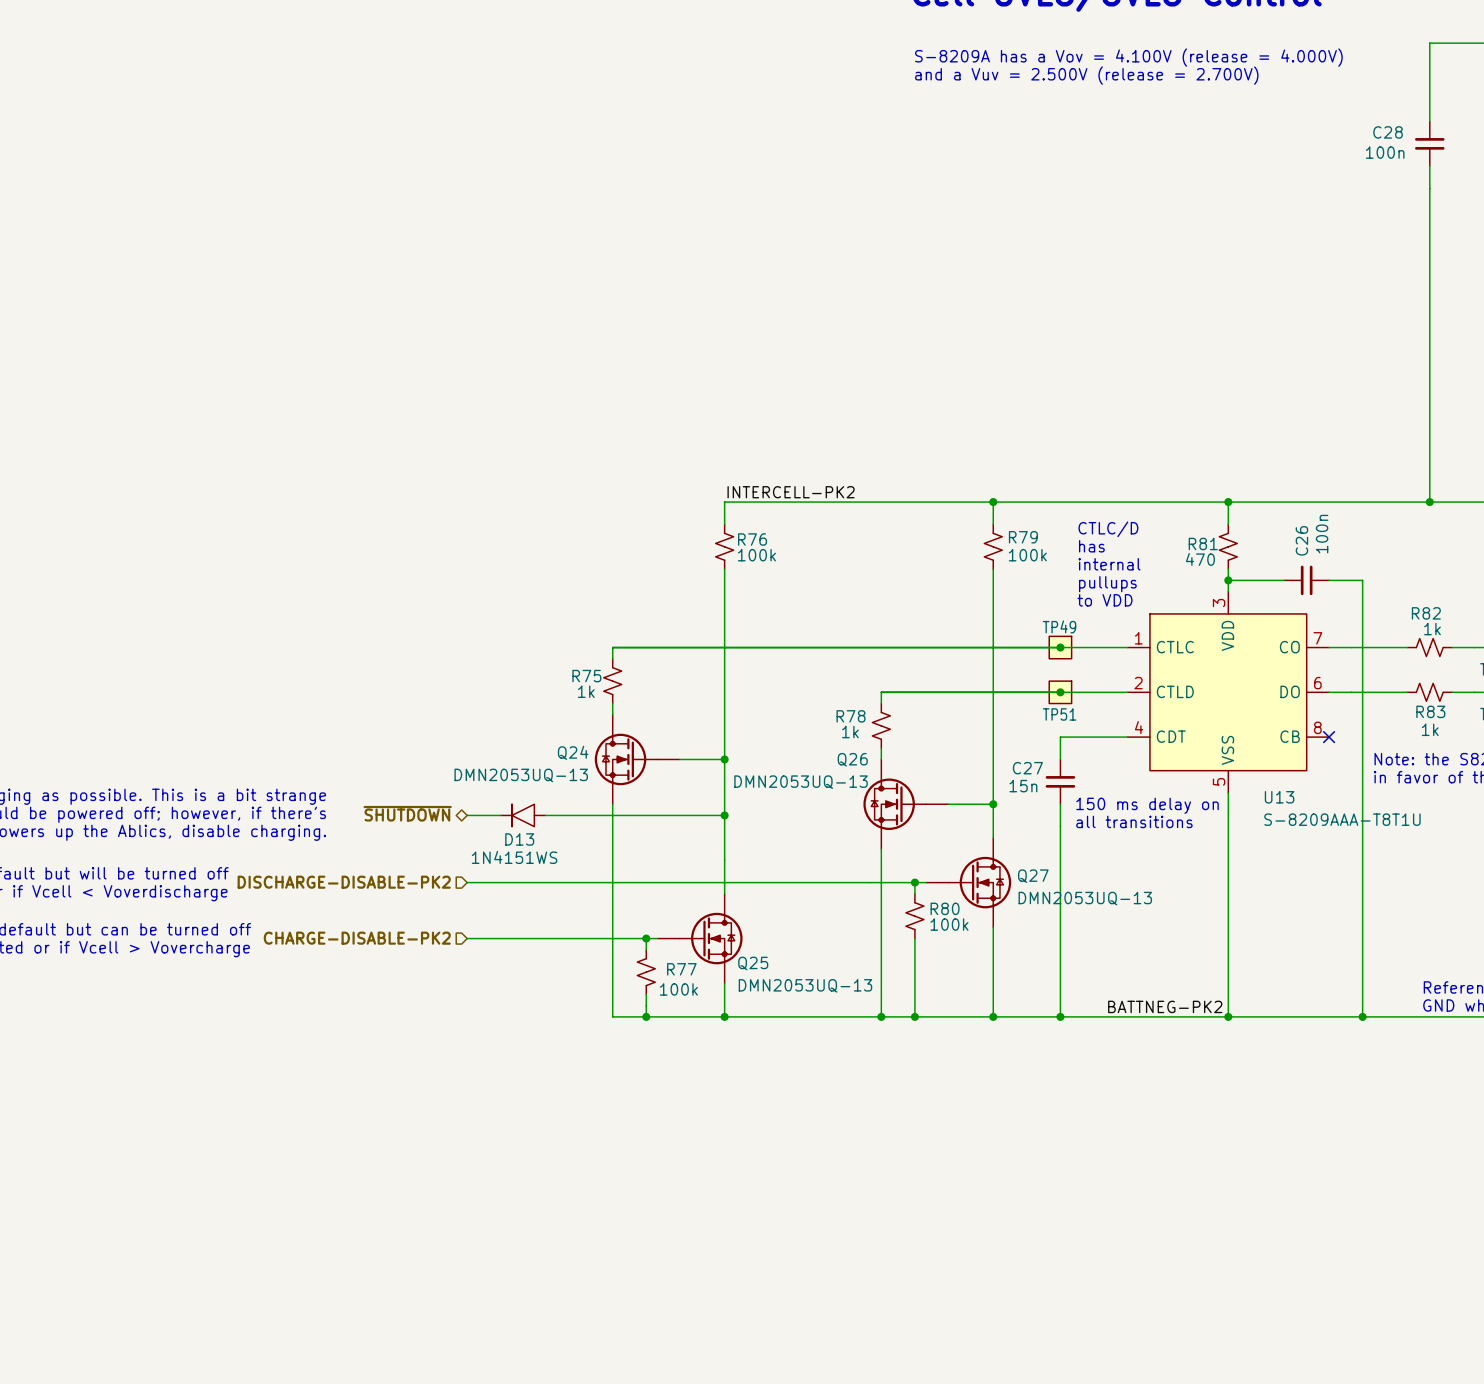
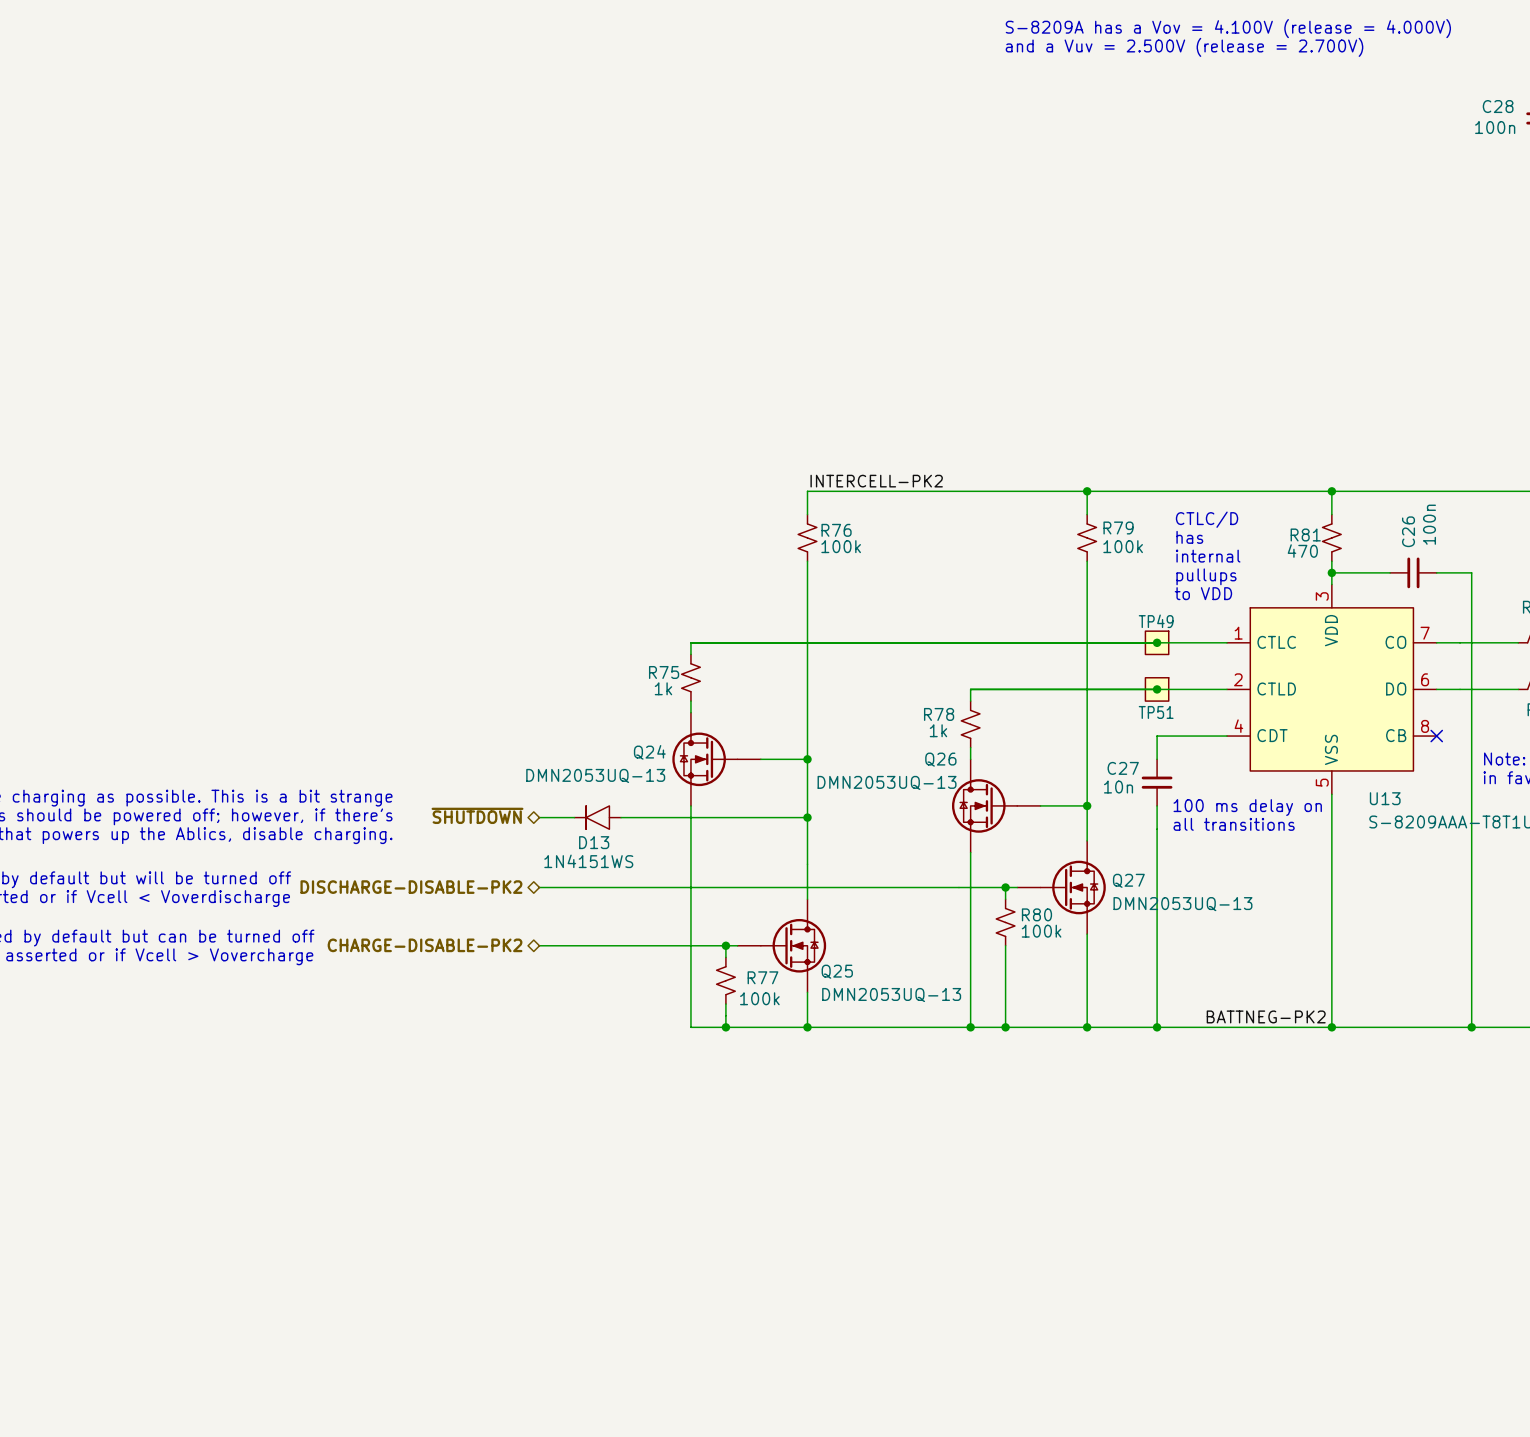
C27 value: 15n (1023, 786) -> 10n (1118, 787)
text: 150 ms delay on (1147, 805) -> 100 ms delay on (1247, 807)
hierarchical label shape: input (344, 882) -> bidirectional (411, 887)
hierarchical label shape: input (357, 938) -> bidirectional (425, 945)

